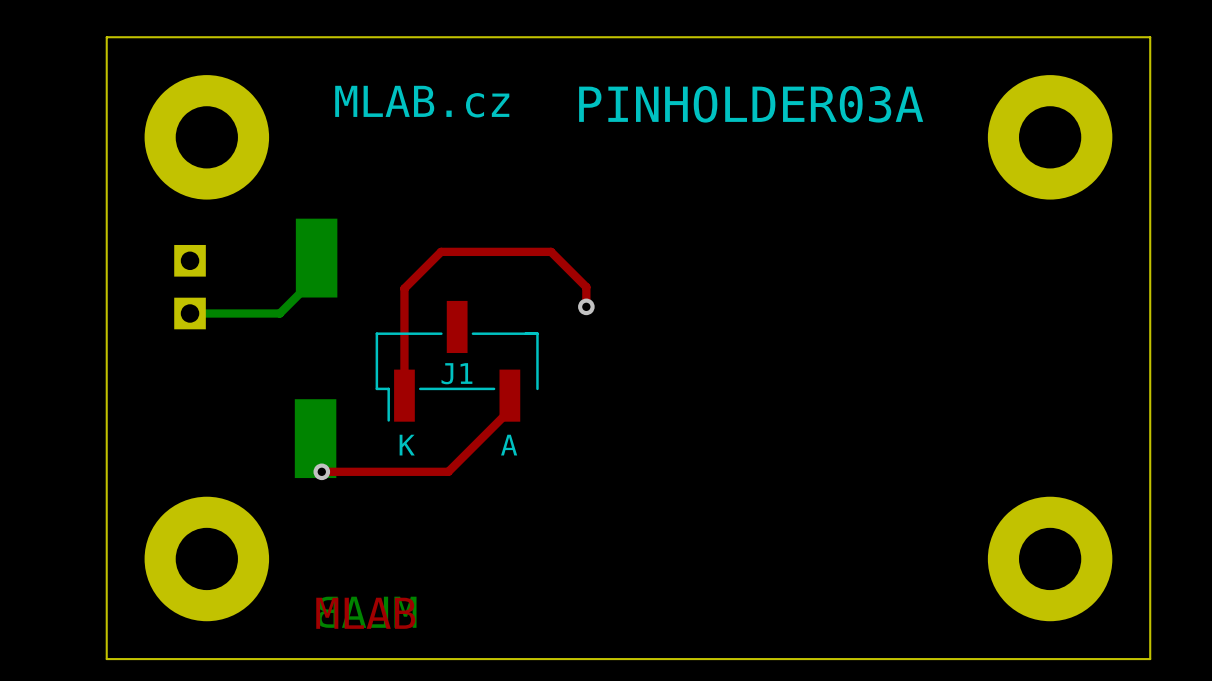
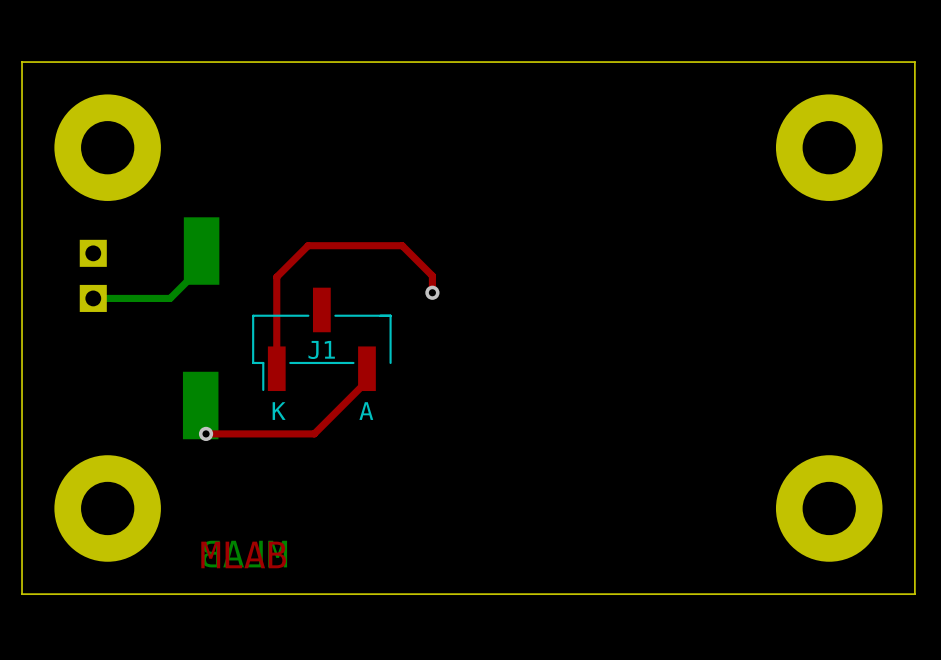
text: MLAB.cz (422, 101) -> none
text: PINHOLDER03A (751, 104) -> none

